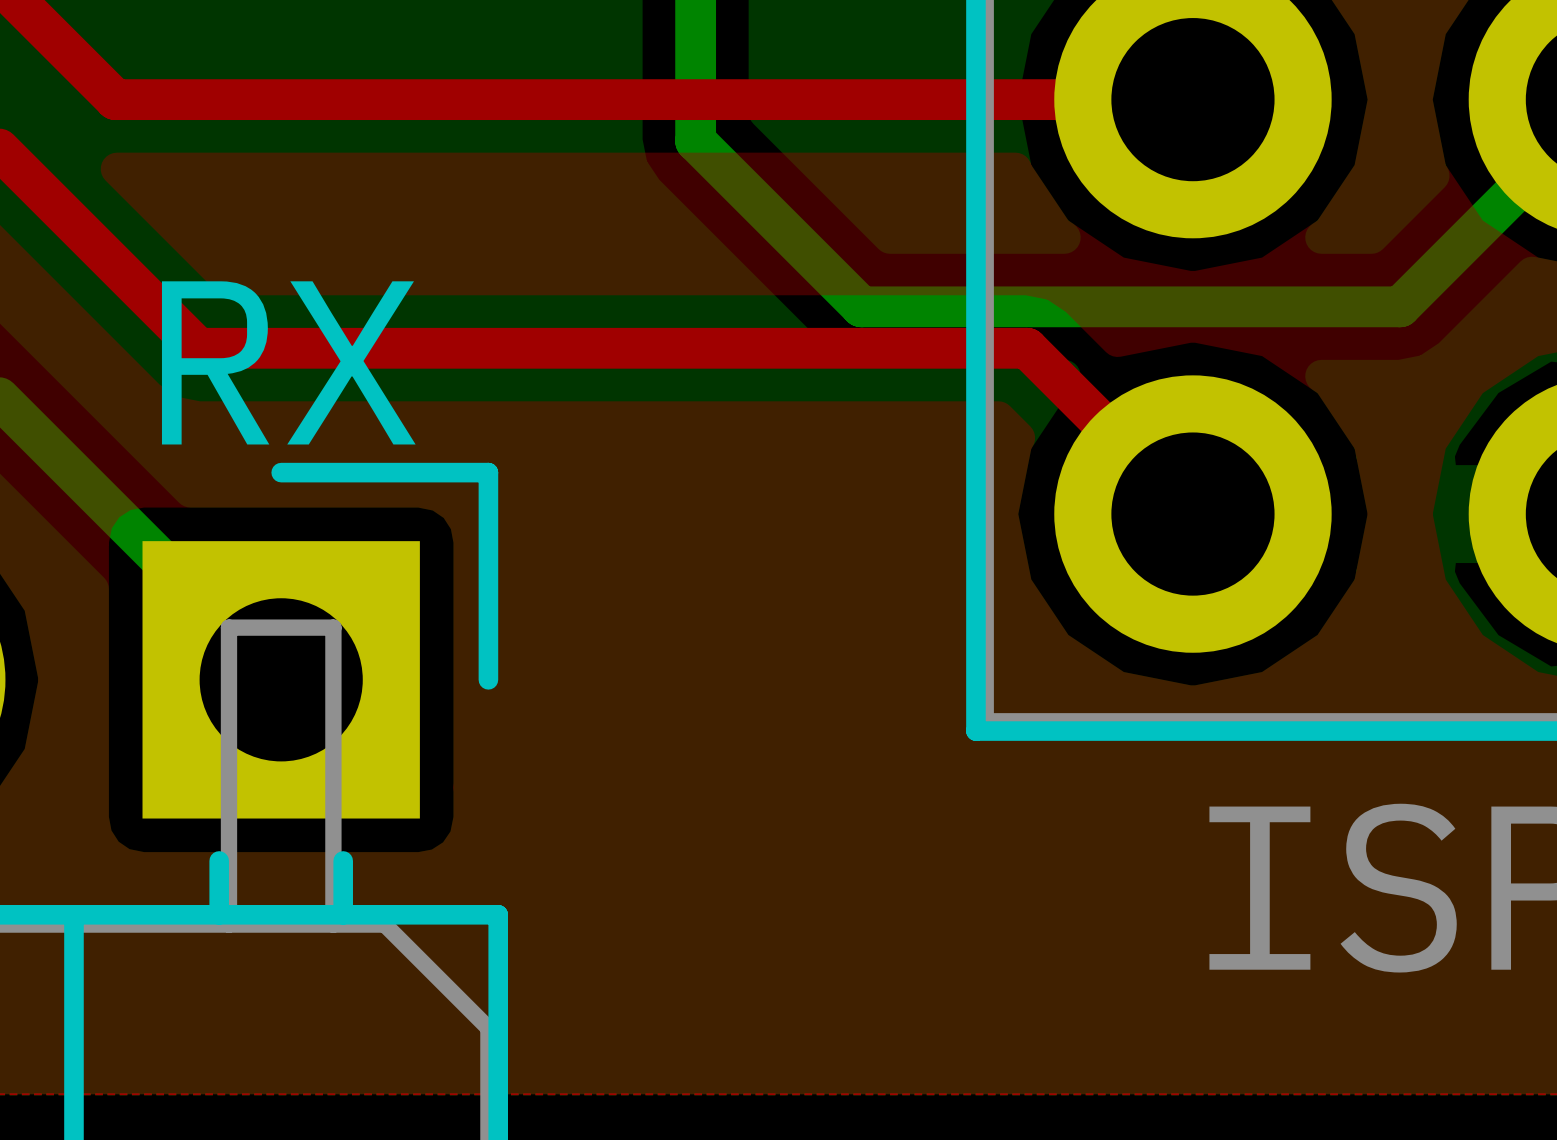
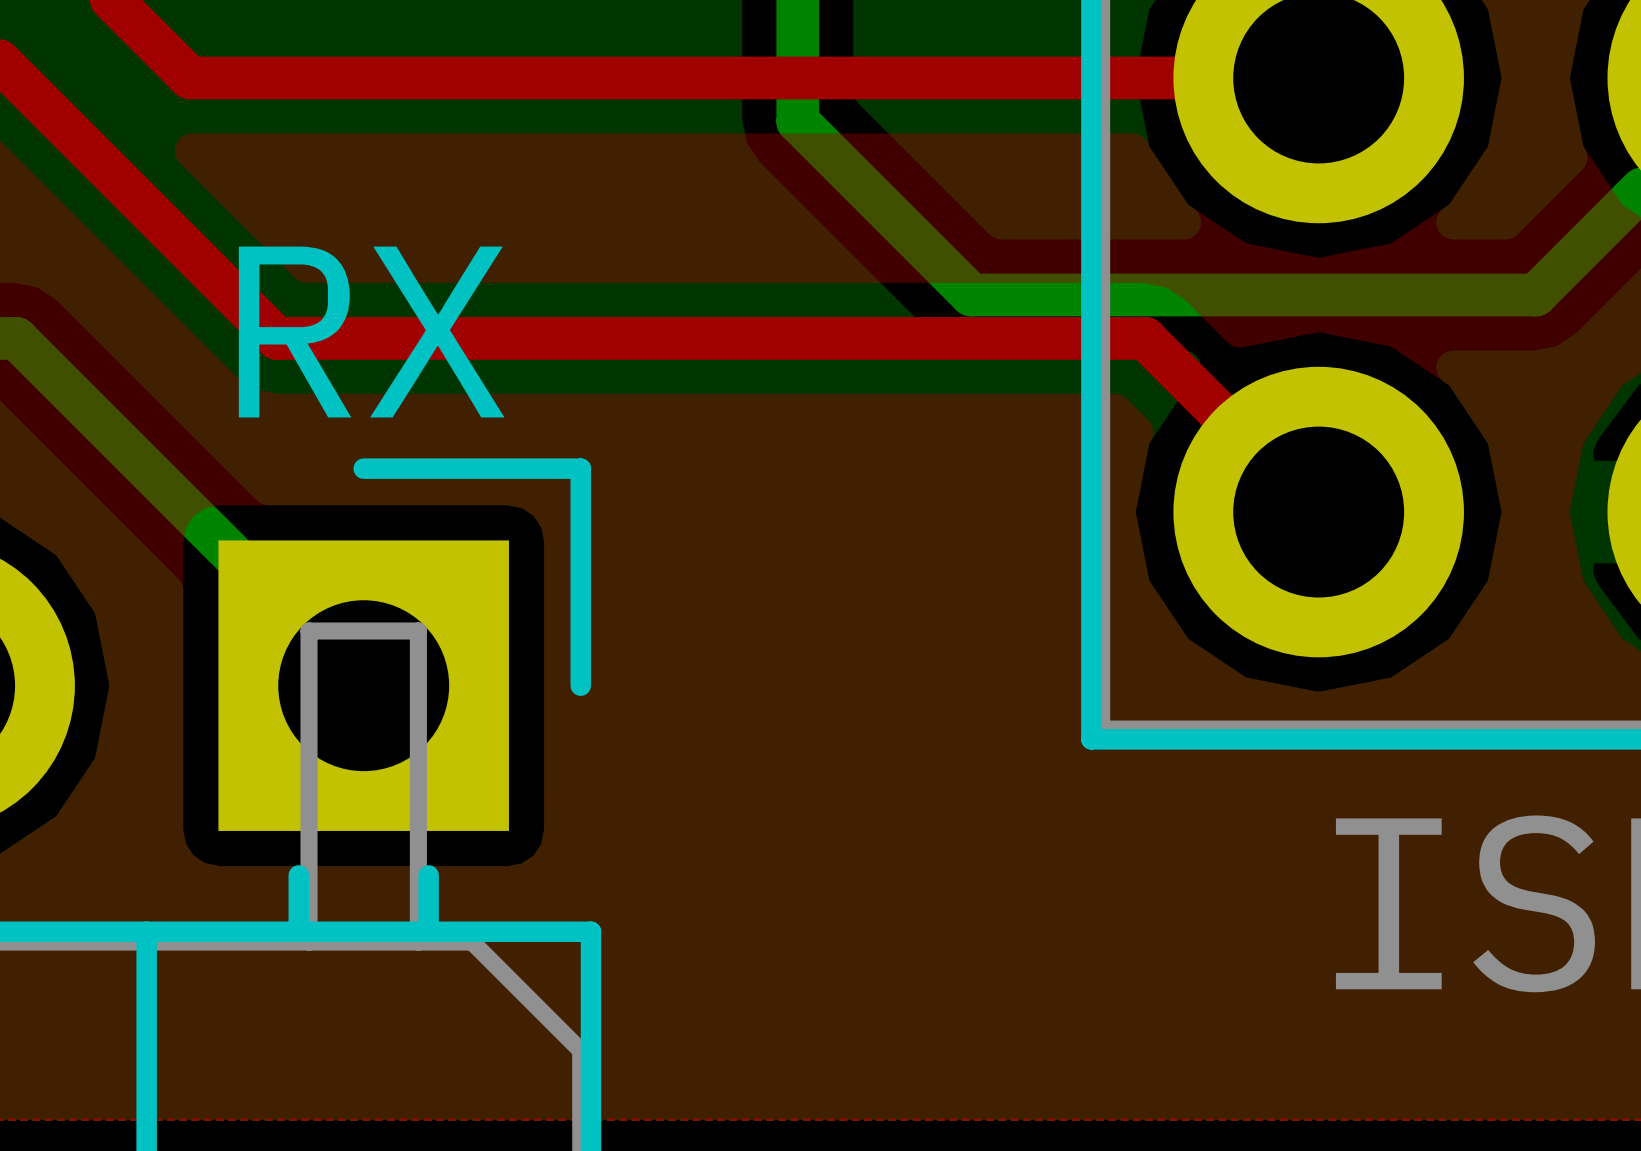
RX name position: RX (288, 362) -> RX (371, 332)

